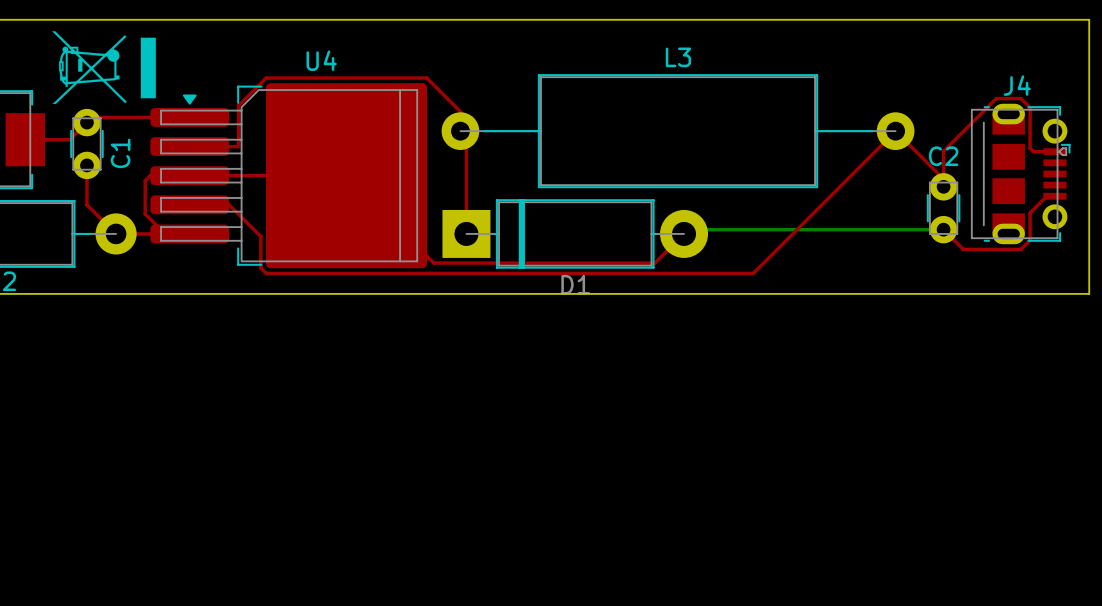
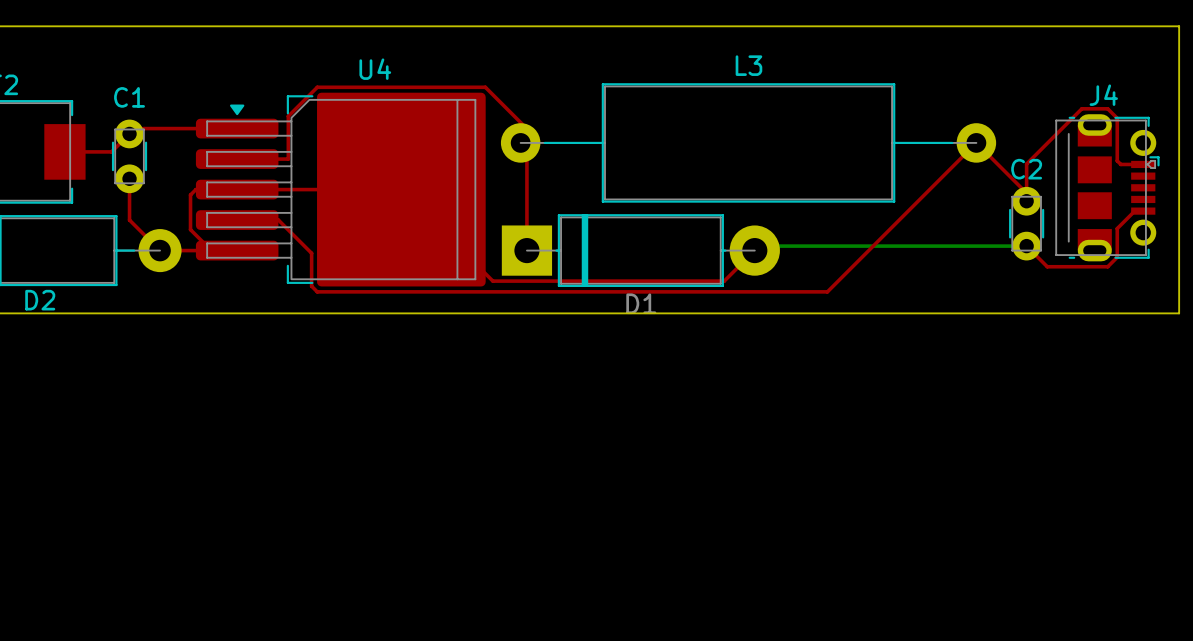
drawing: [52, 31, 156, 105] -> none
C1 name rotation: 0° (120, 153) -> 90° clockwise (129, 97)
C1 name position: C1 (120, 153) -> C1 (129, 97)

